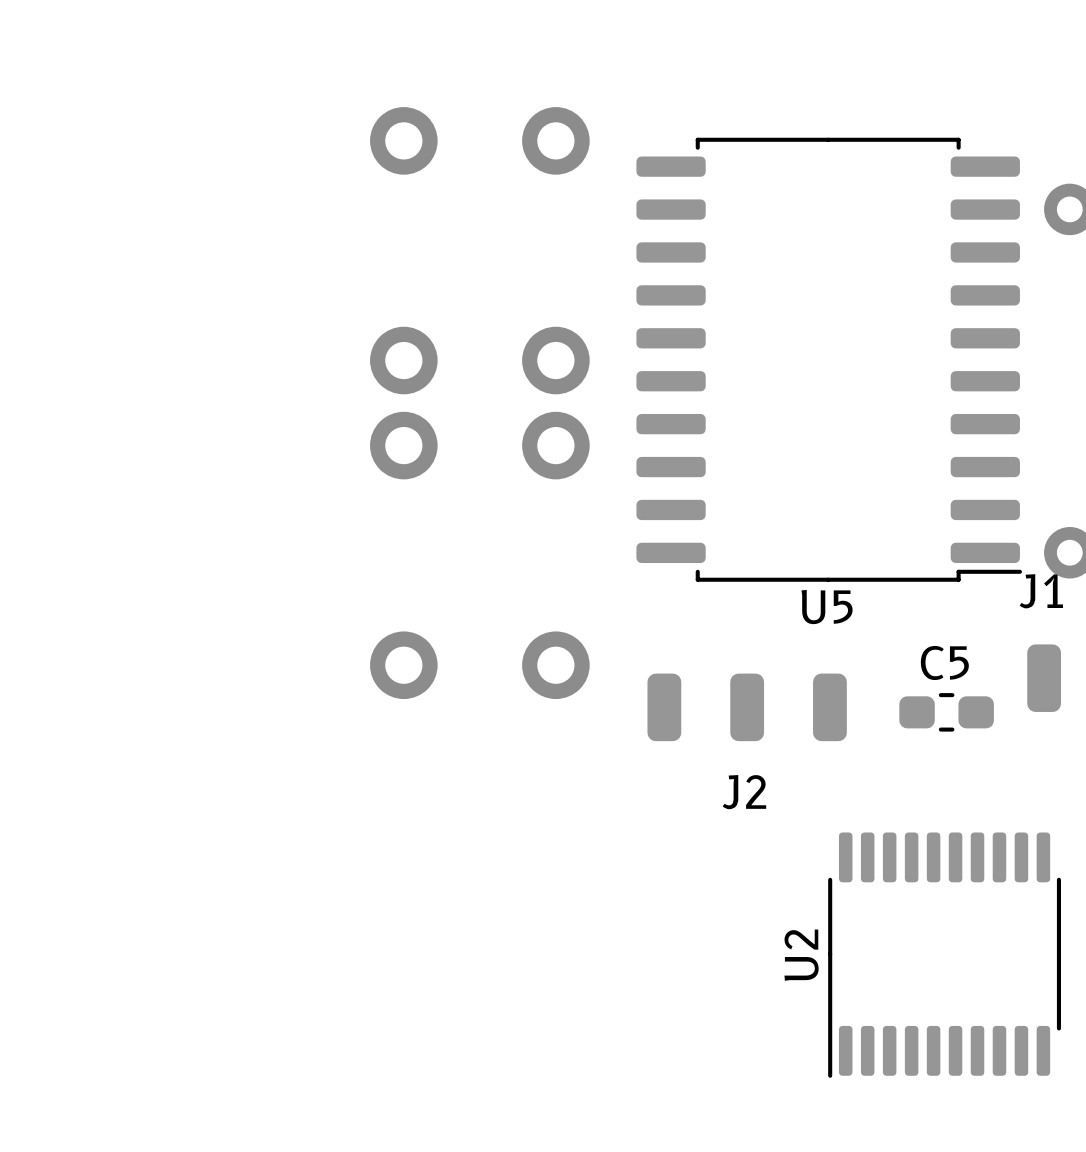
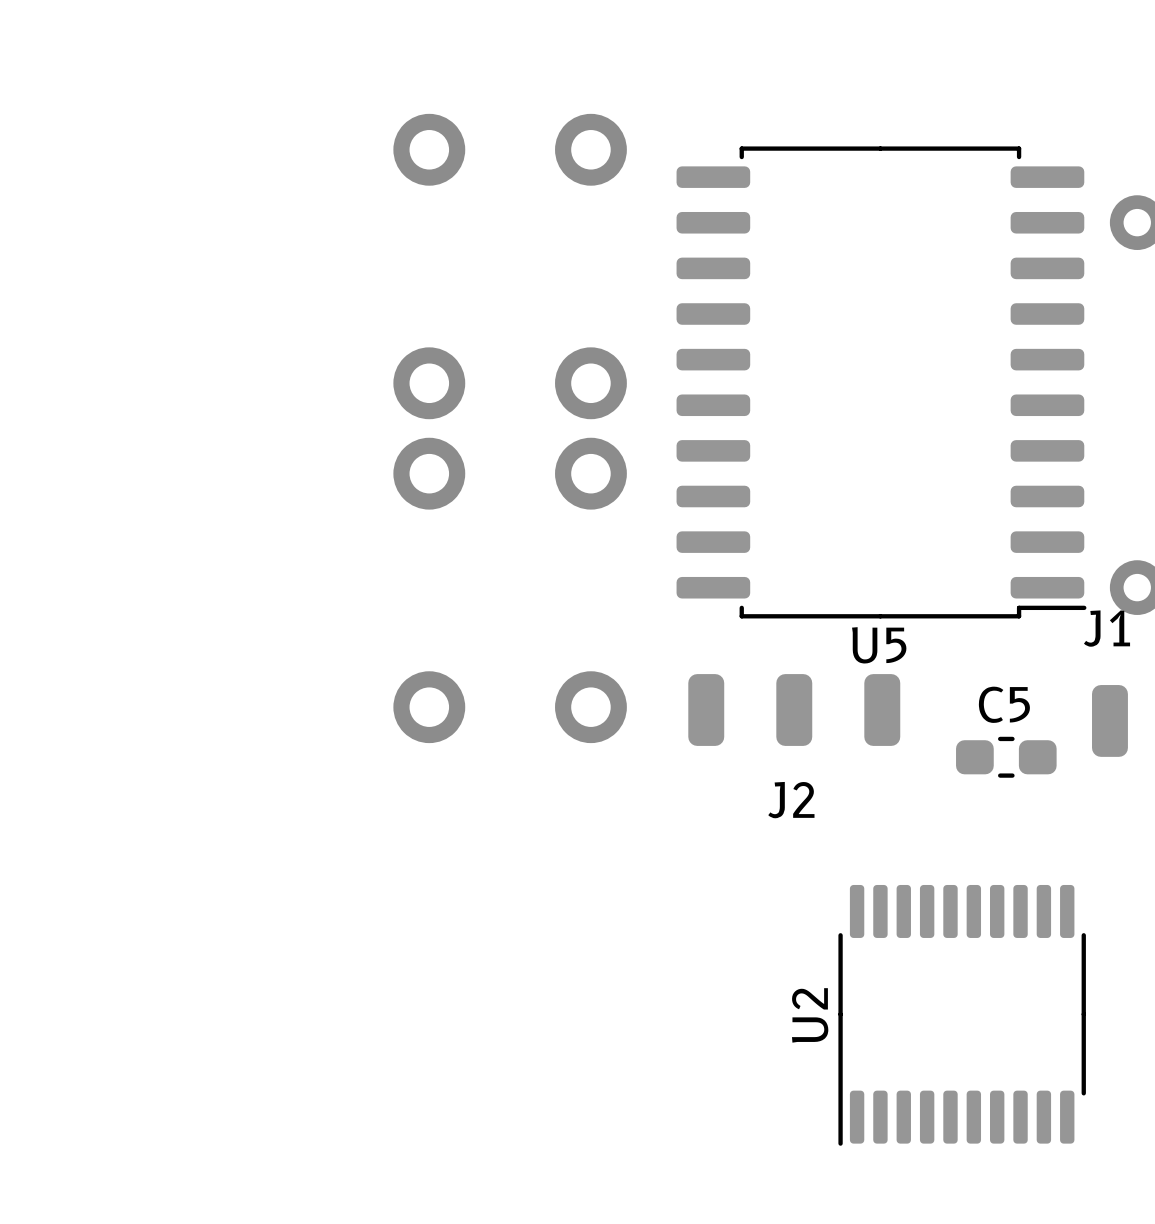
J2 position: (747, 707) -> (794, 710)
U2 position: (944, 955) -> (962, 1015)

